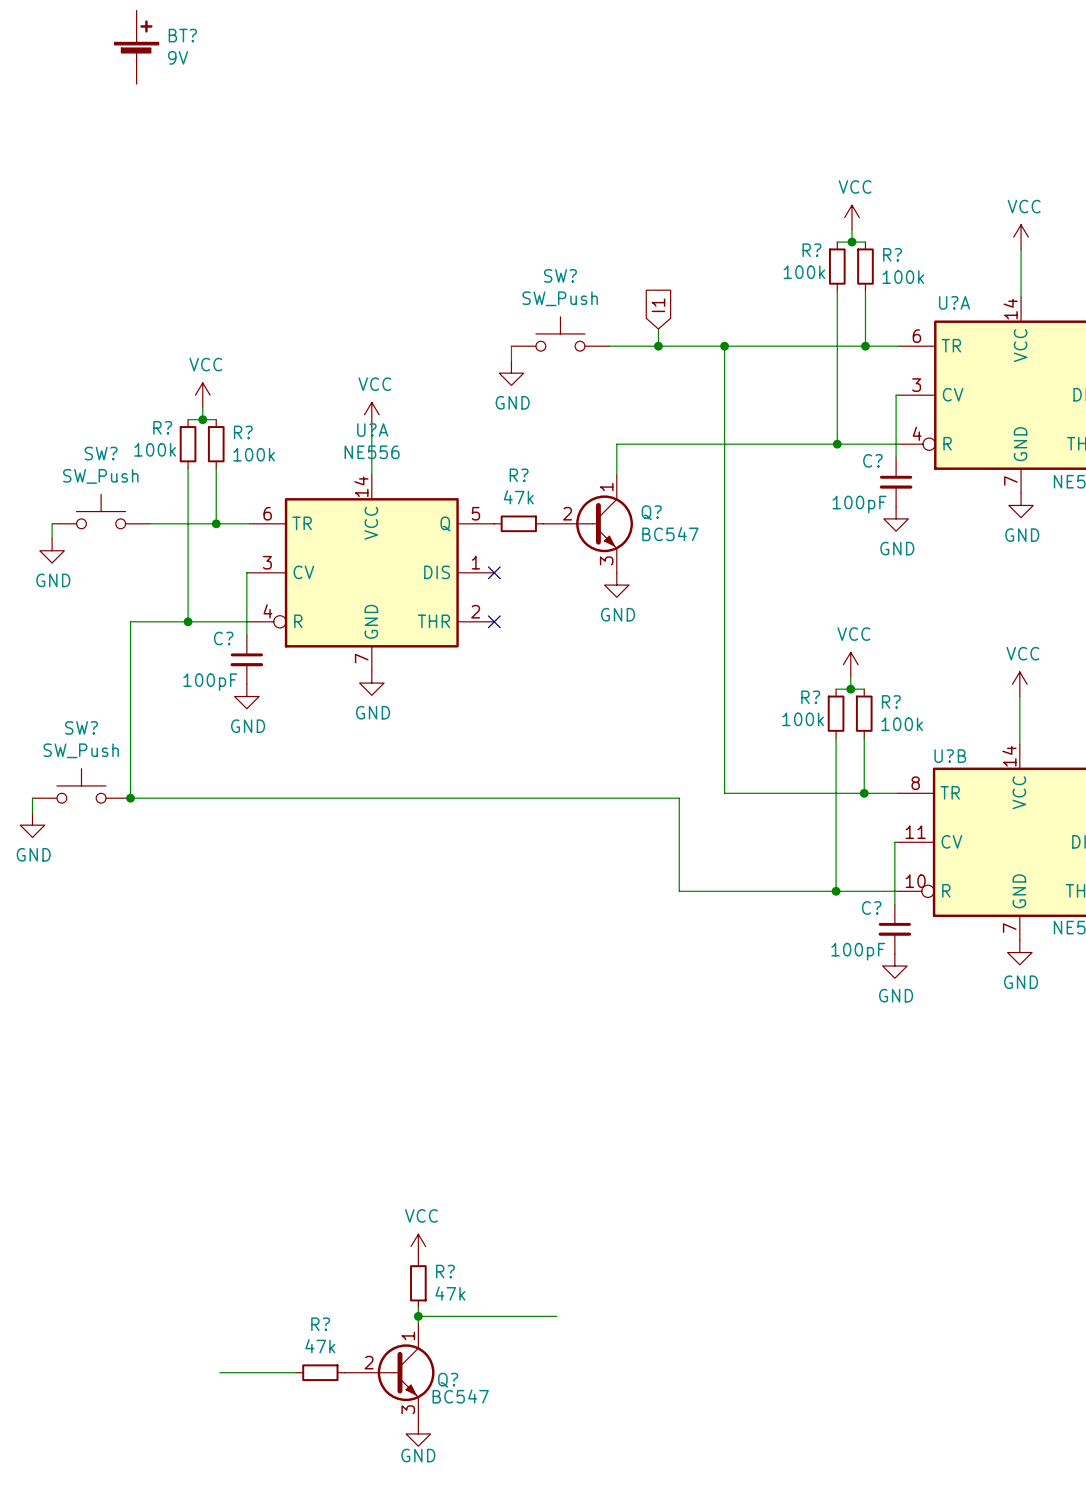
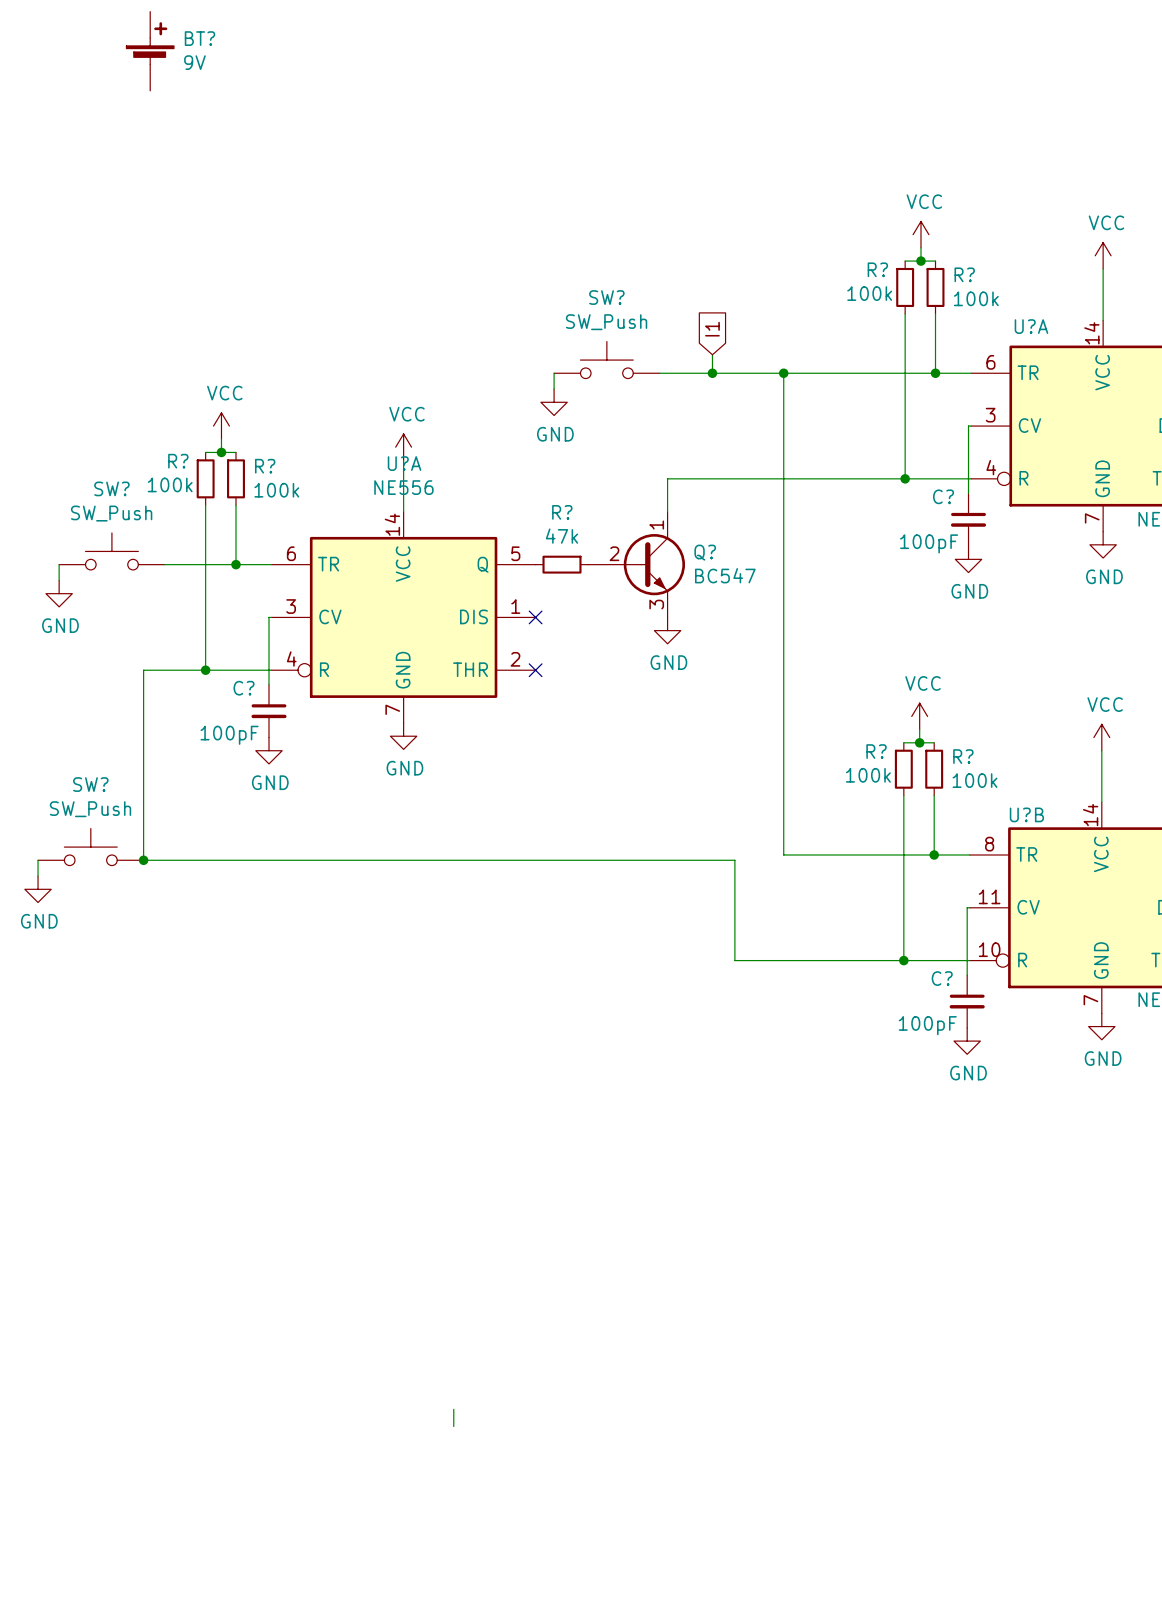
power symbol: VCC (418, 1246) -> none
R?: 47k (418, 1283) -> none
wire: (418, 1316) (556, 1316) -> none
junction: (418, 1316) -> none
wire: (219, 1372) (295, 1372) -> none
R?: 47k (320, 1372) -> none
Q?: BC547 (389, 1372) -> none
power symbol: GND (418, 1433) -> none

